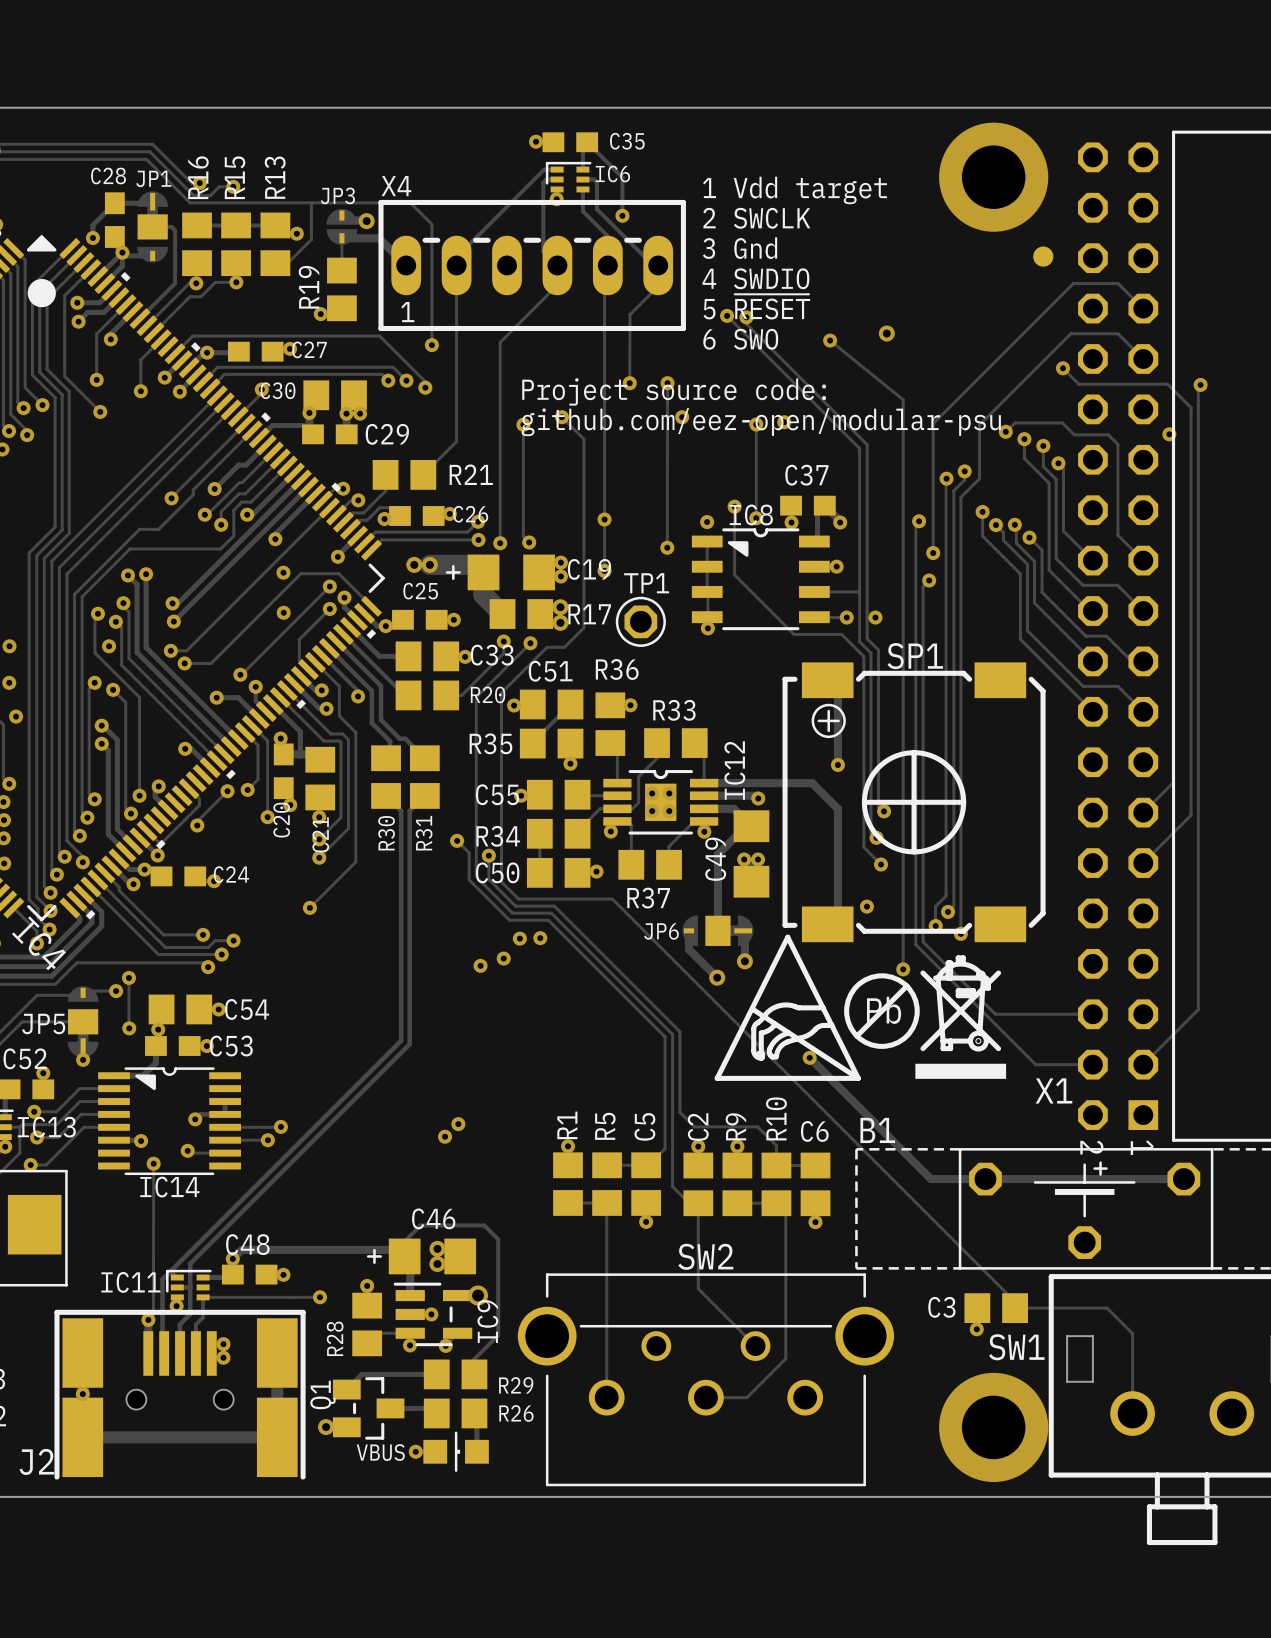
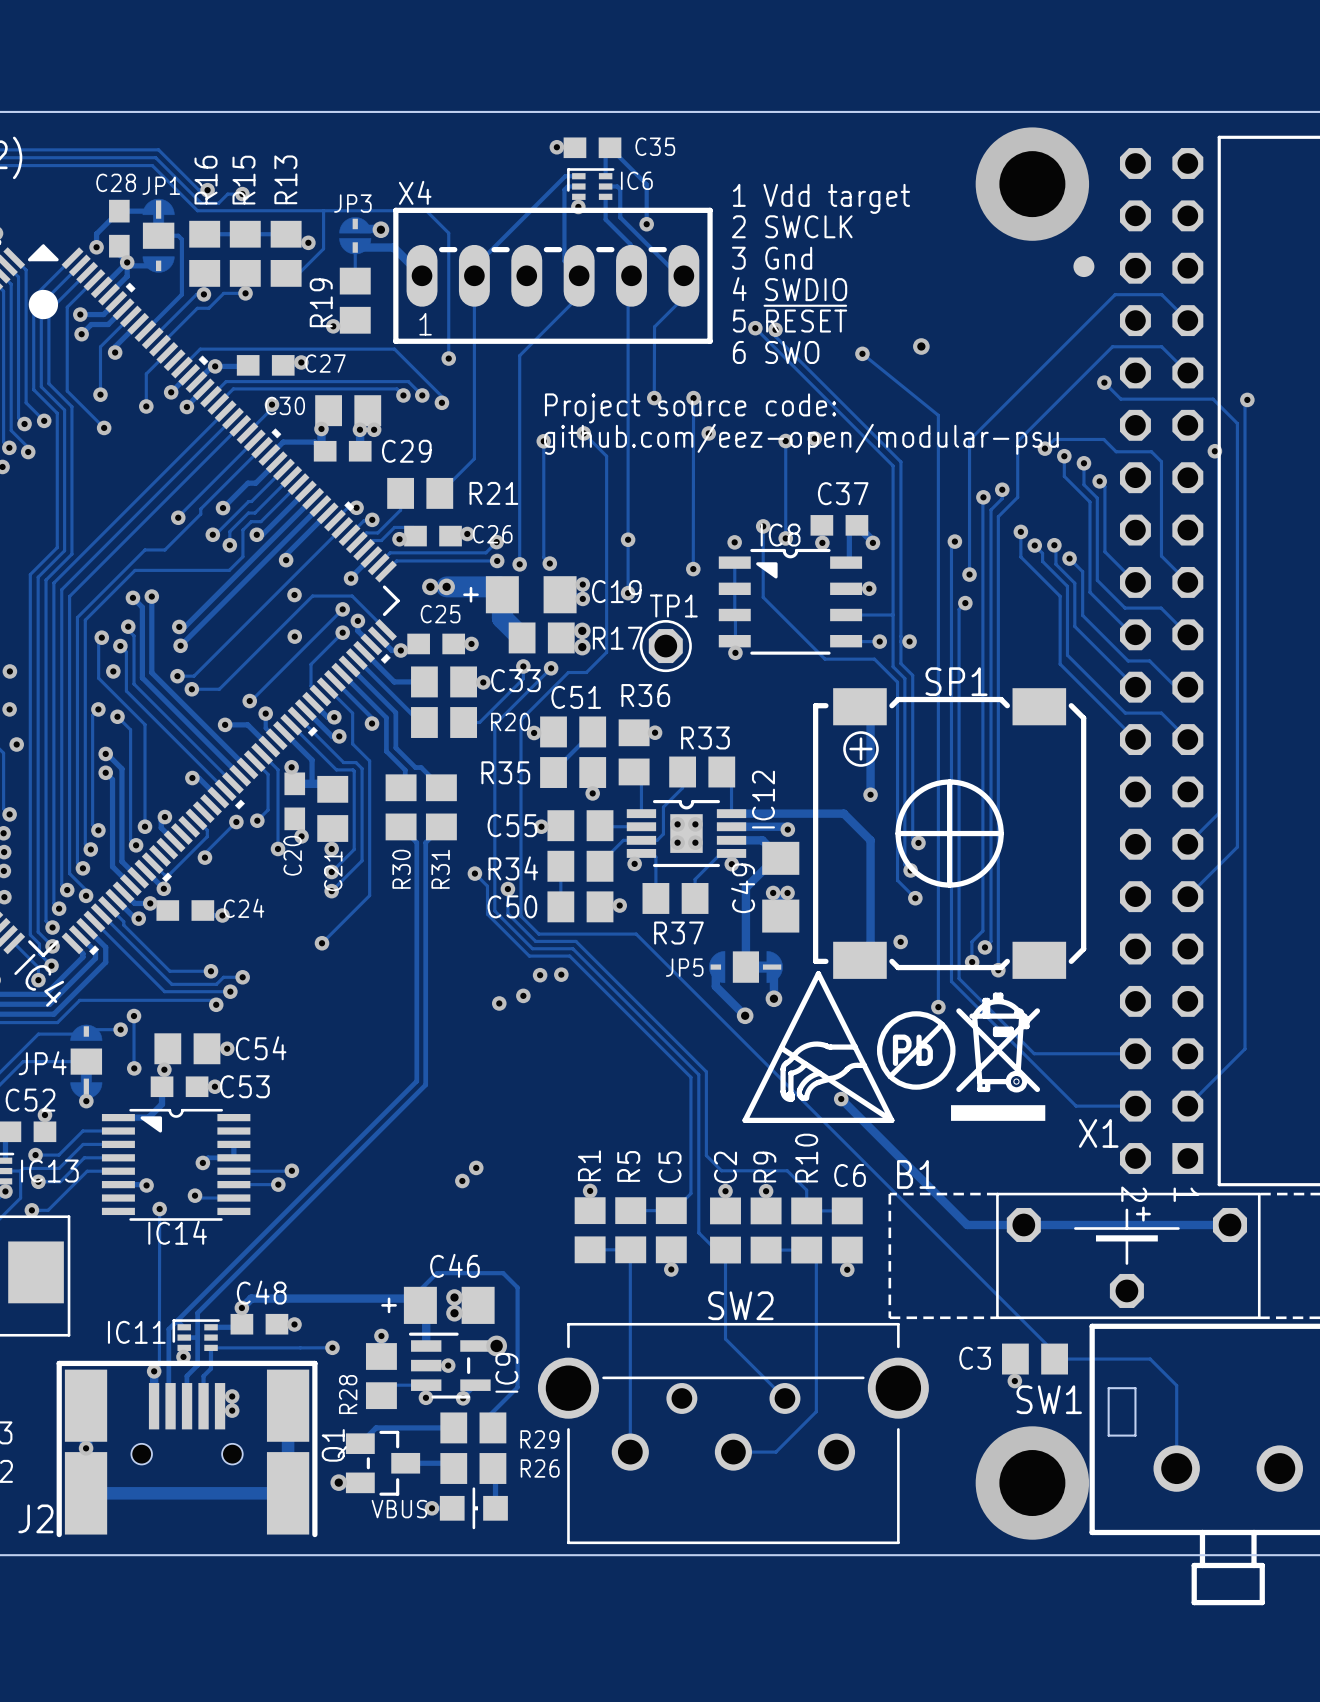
JP6 name: JP6 (661, 931) -> JP5 (684, 967)
JP5 name: JP5 (43, 1024) -> JP4 (42, 1063)

